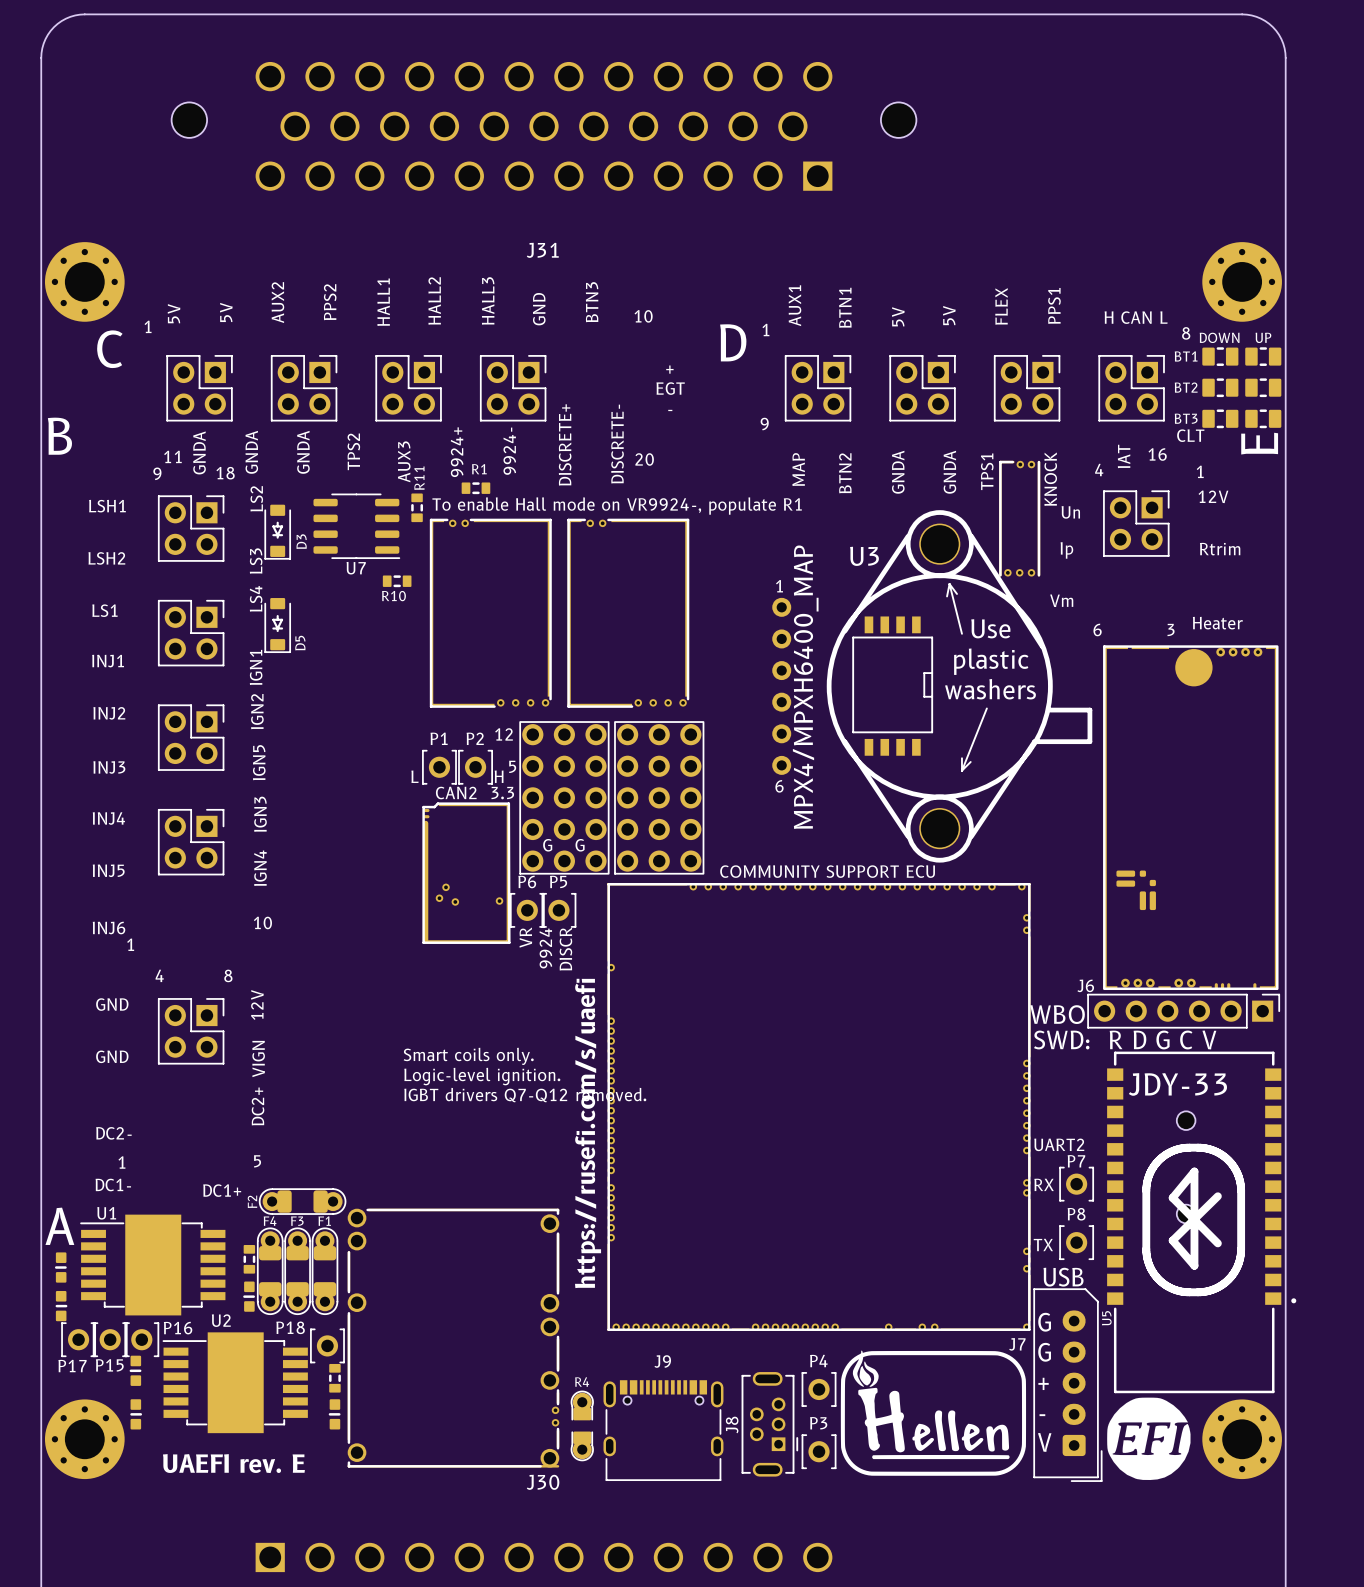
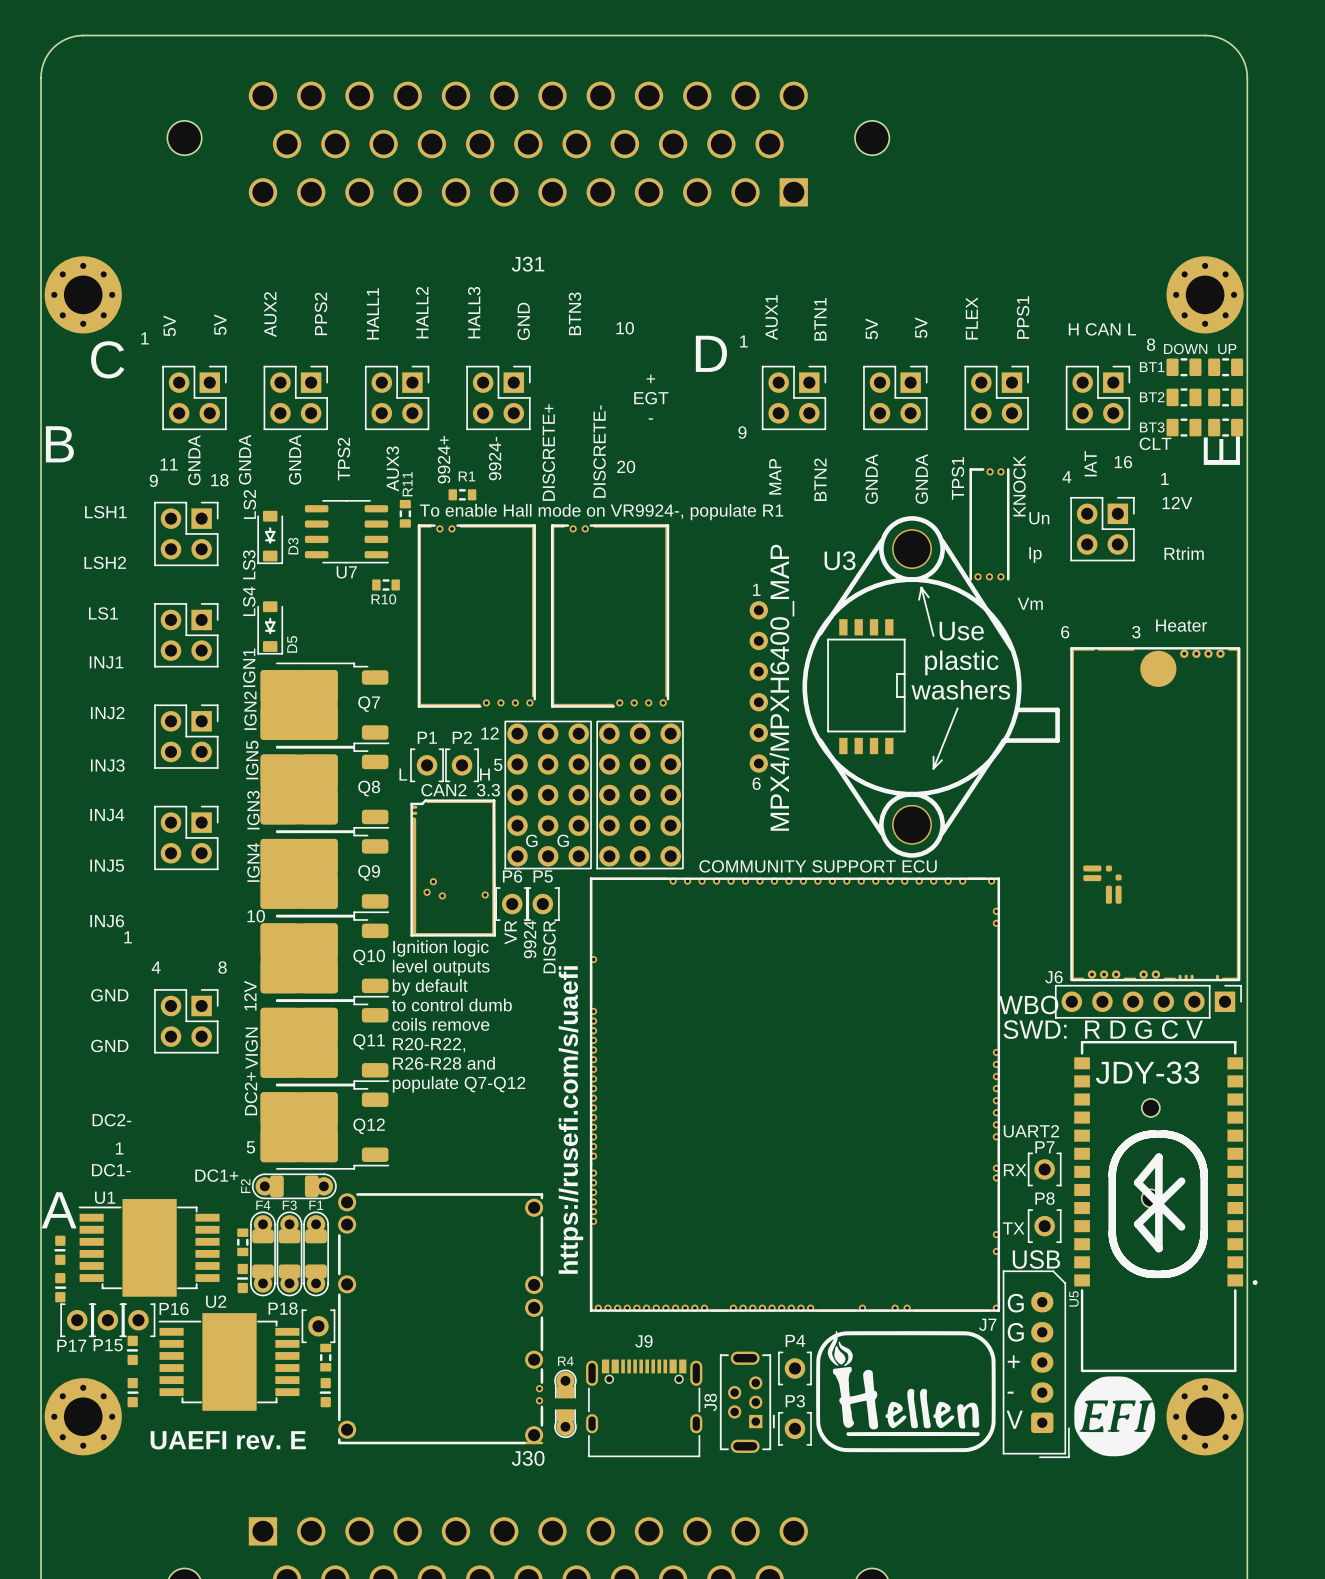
Q7: none -> (324, 705)
Q8: none -> (324, 789)
Q9: none -> (324, 873)
text: none -> Ignition logic (441, 948)
Q10: none -> (324, 958)
text: none -> level outputs (441, 967)
text: none -> by default (430, 987)
text: none -> to control dumb (451, 1005)
text: none -> coils remove (440, 1024)
Q11: none -> (324, 1042)
text: Smart coils only. (468, 1056) -> R20-R22, (429, 1045)
text: Logic-level ignition. (482, 1076) -> R26-R28 and (444, 1063)
text: IGBT drivers Q7-Q12 removed. (525, 1095) -> populate Q7-Q12 (459, 1084)
Q12: none -> (324, 1127)

